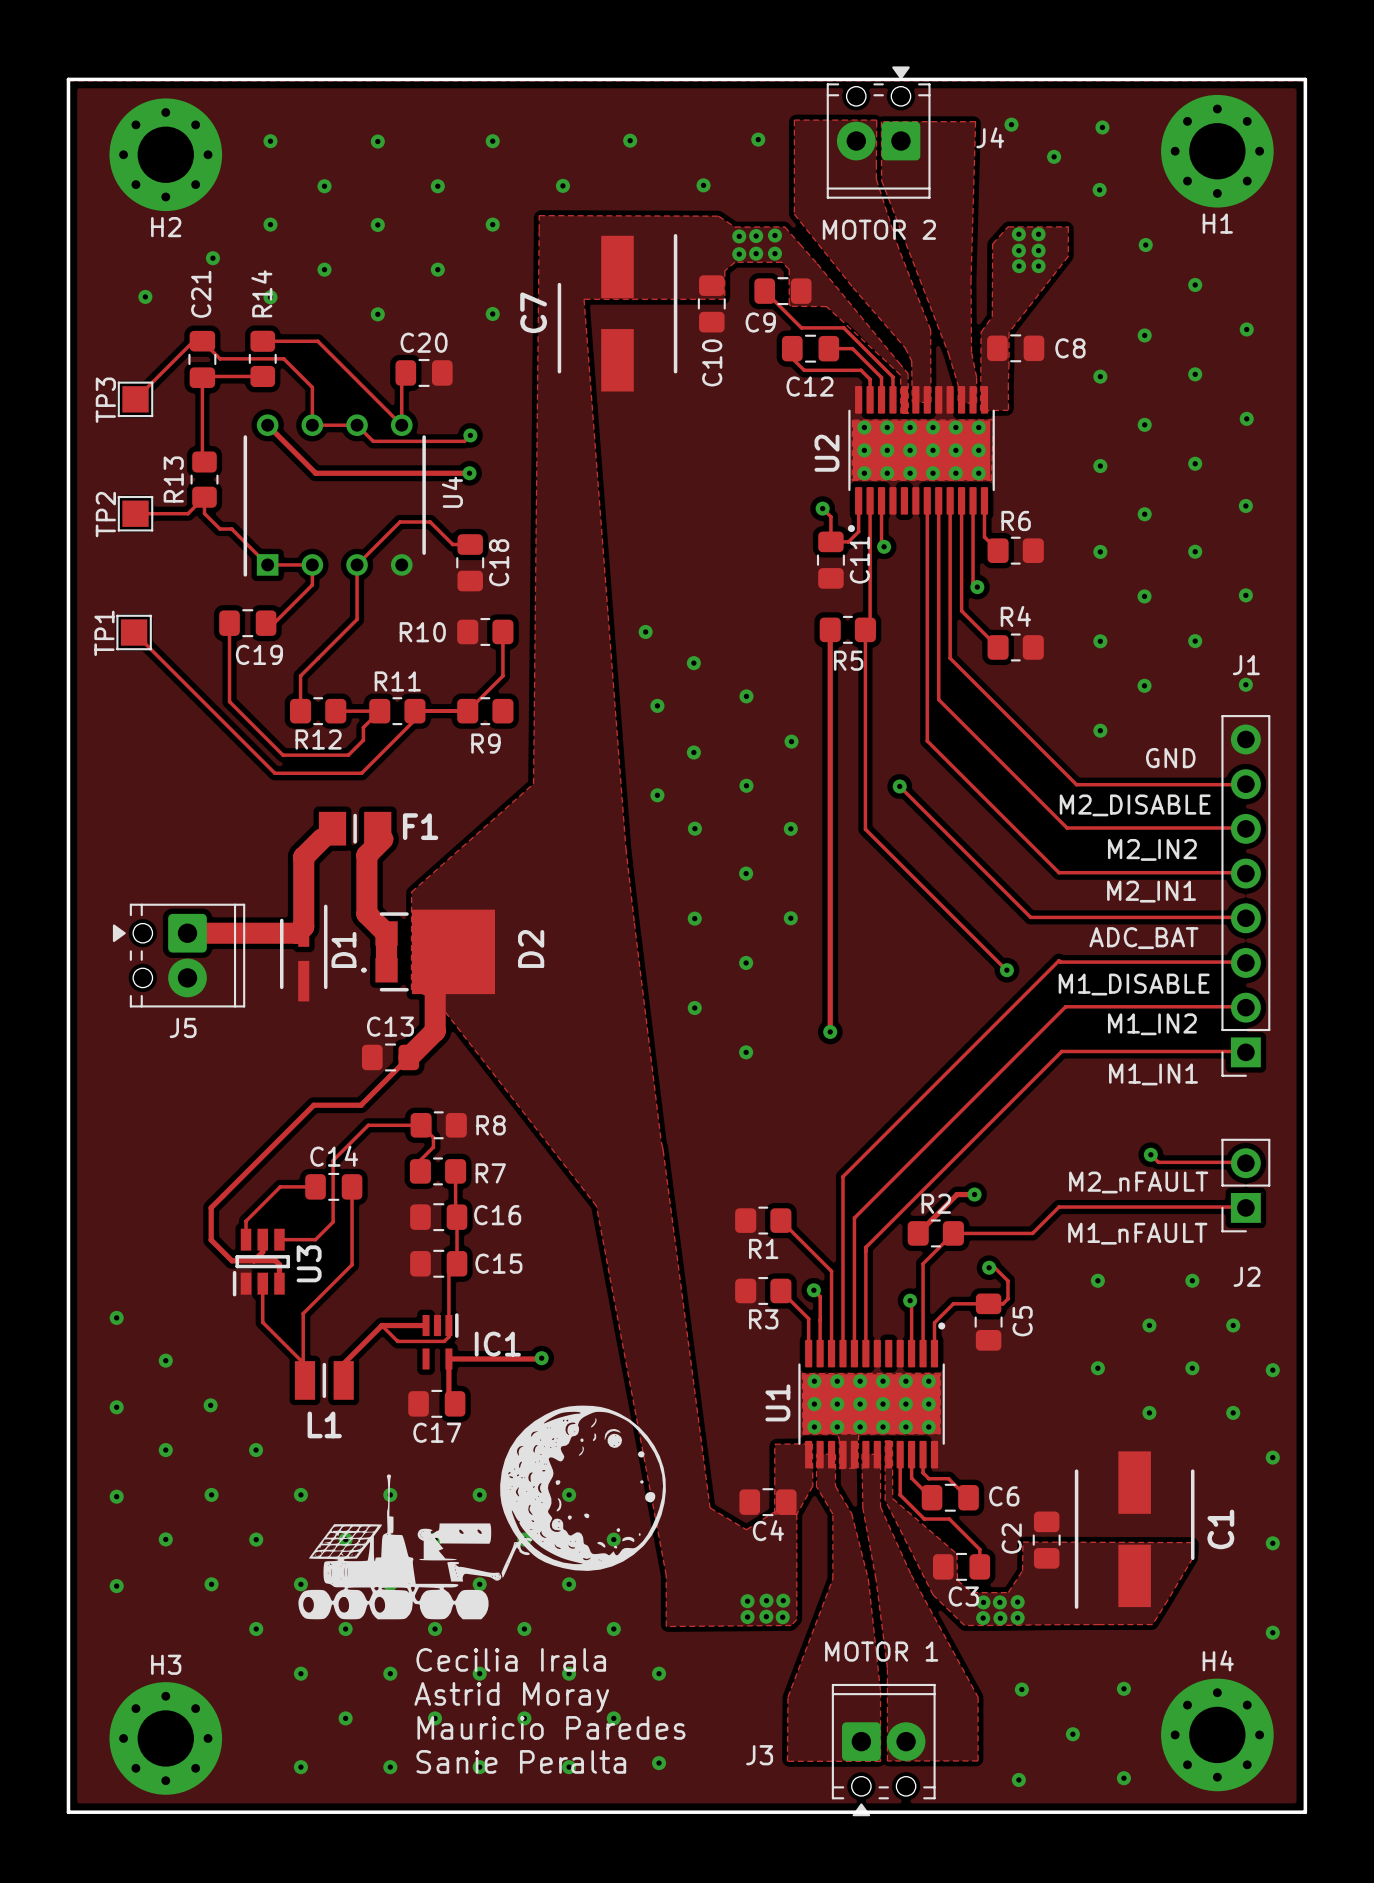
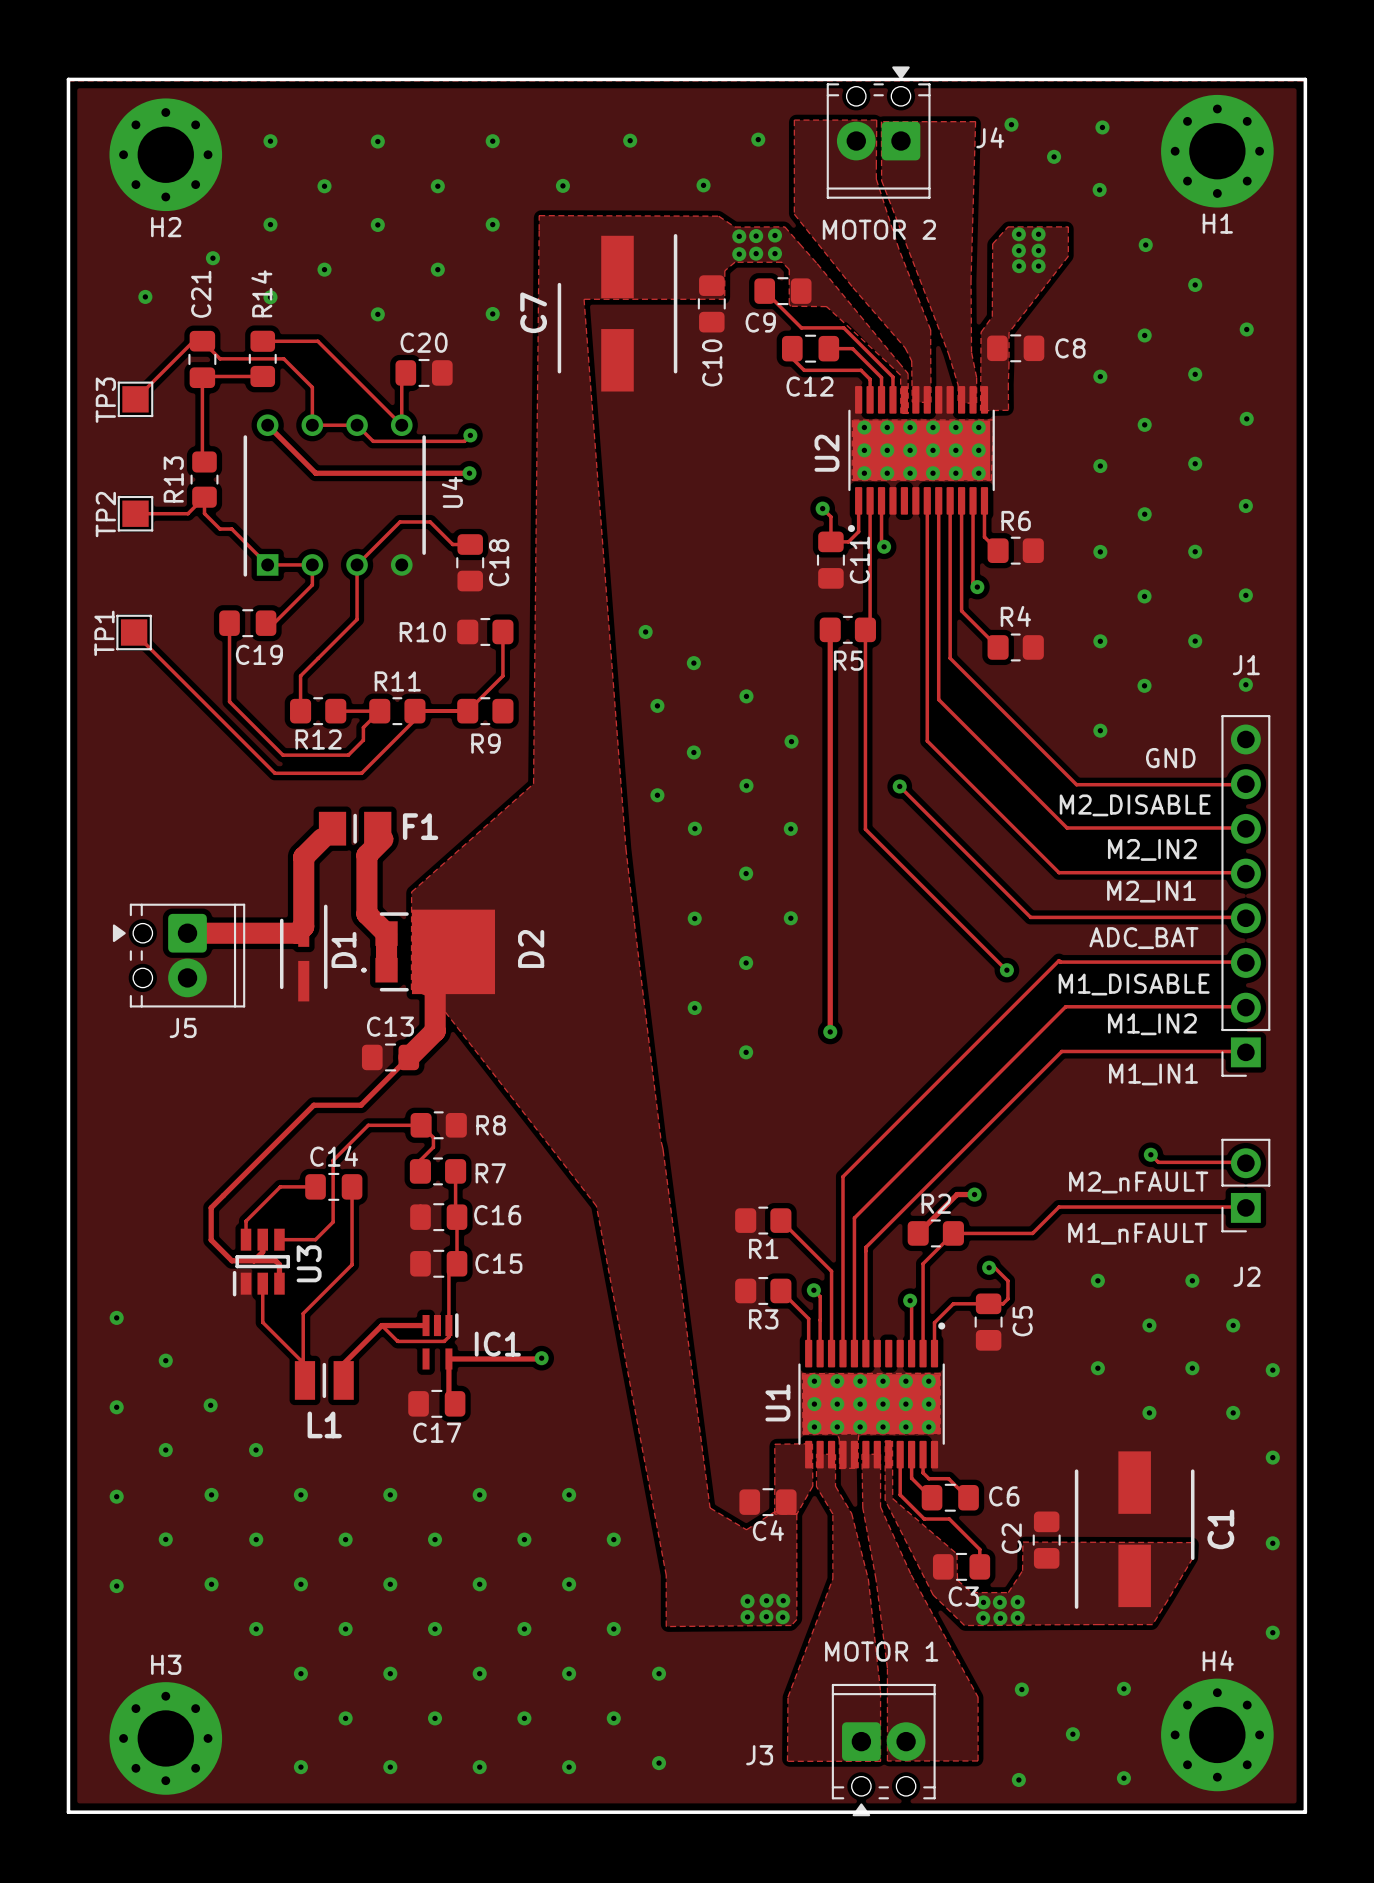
drawing: [298, 1405, 666, 1620] -> none
text: Cecilia Irala (511, 1659) -> none
text: Astrid Moray (511, 1697) -> none
text: Mauricio Paredes (551, 1727) -> none
text: Sanie Peralta (521, 1761) -> none

